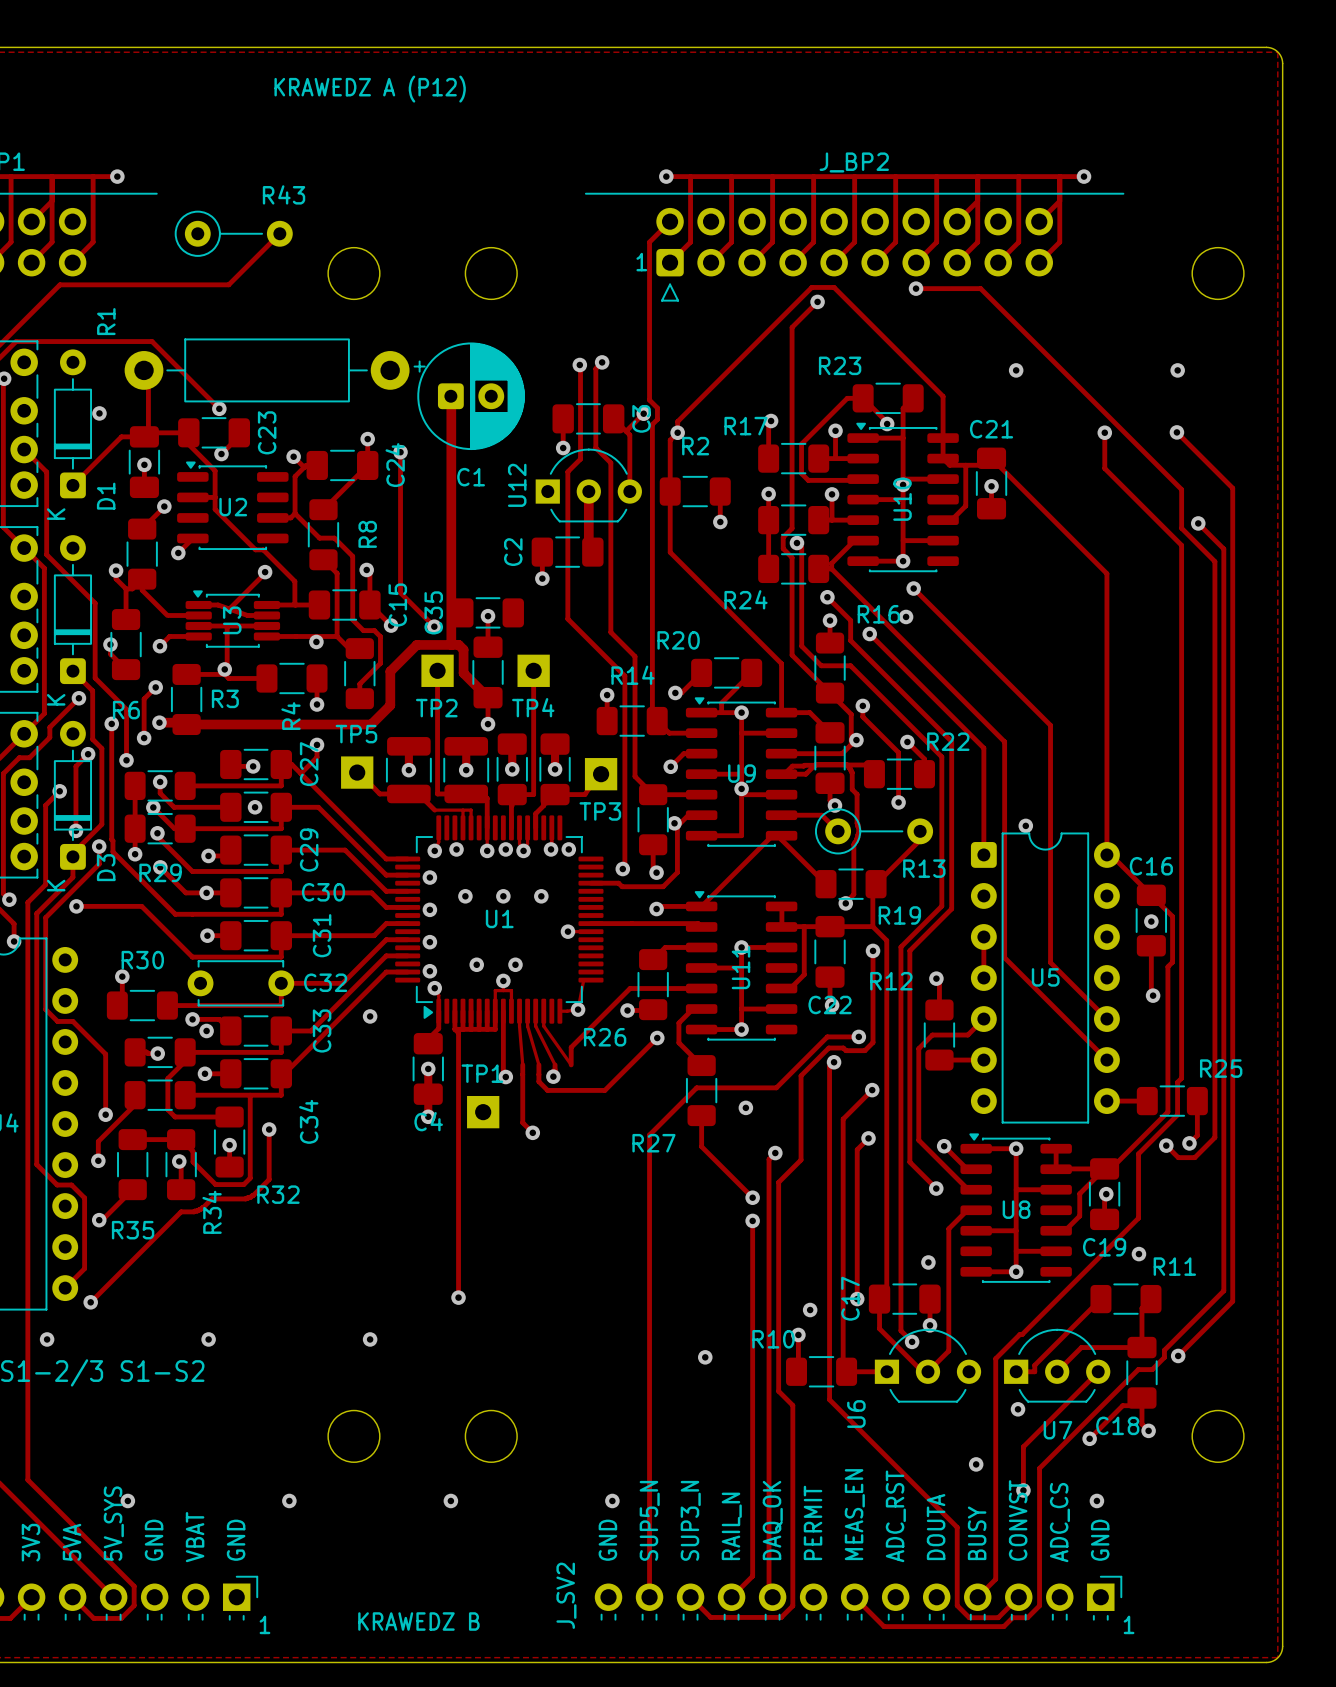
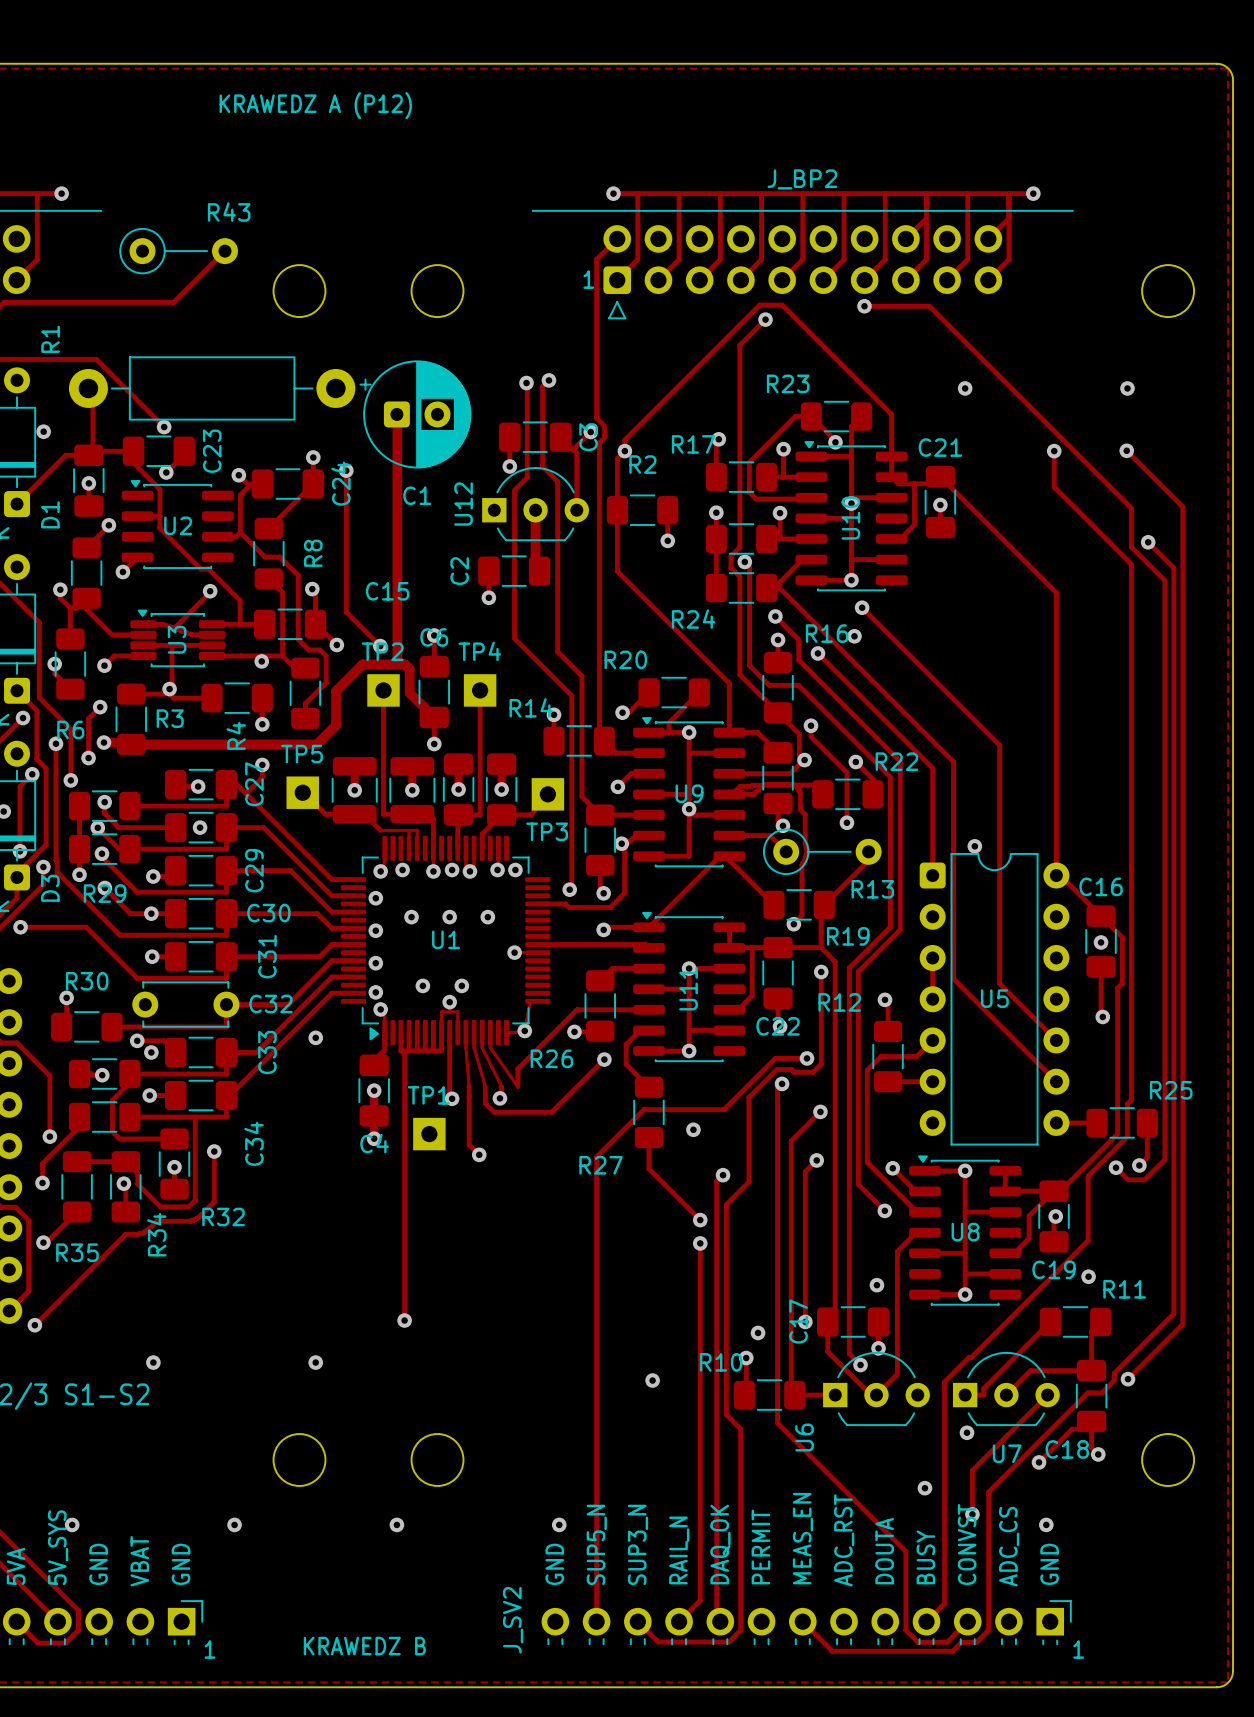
C15 name rotation: 0° (397, 605) -> 90° clockwise (387, 591)
C35: (488, 612) -> none
C6 name: none -> C6 (434, 637)
R14 name position: R14 (632, 675) -> R14 (531, 707)
TP4 name position: TP4 (533, 707) -> TP4 (479, 651)
TP2 name position: TP2 (436, 708) -> TP2 (382, 651)

